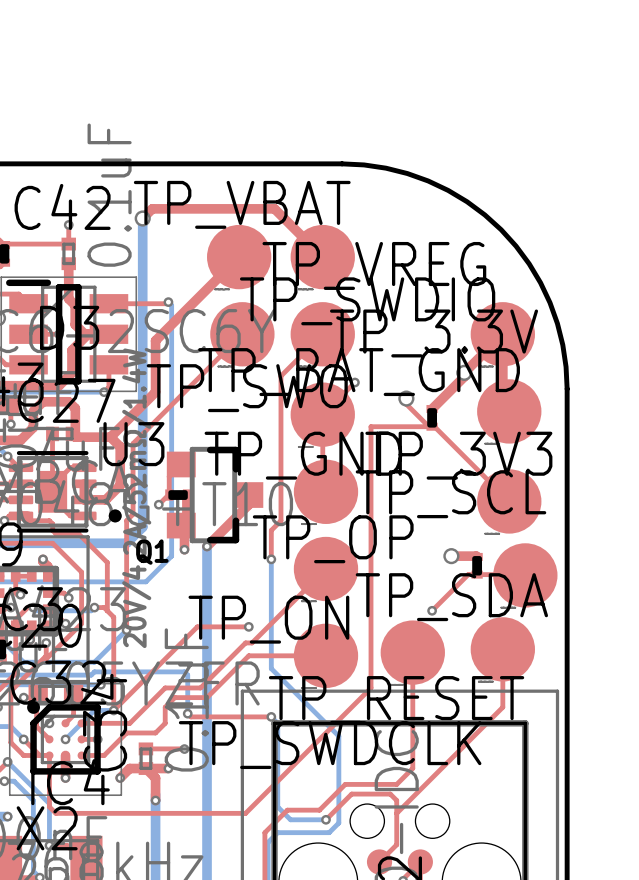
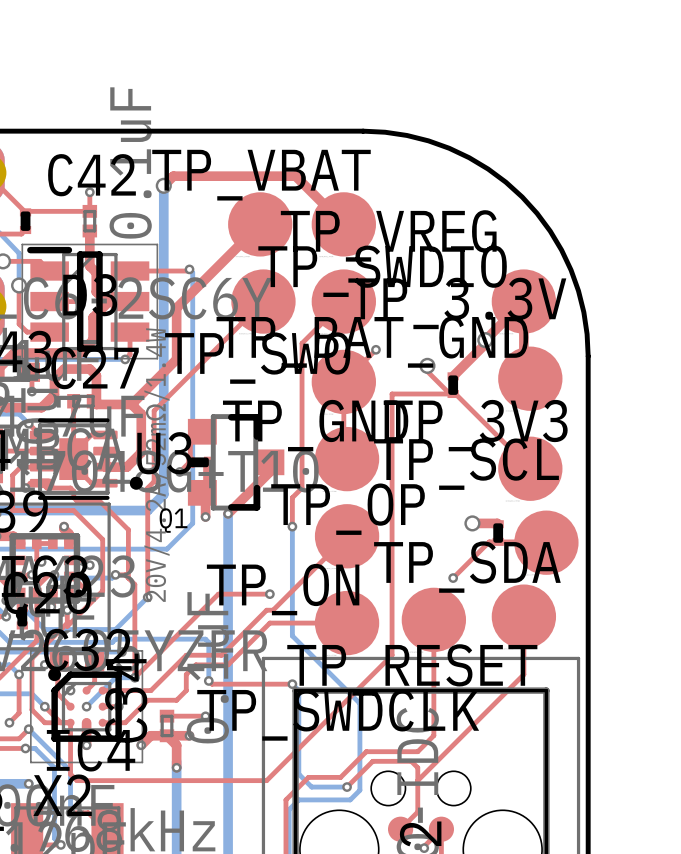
U3 name position: U3 (133, 444) -> U3 (164, 453)

